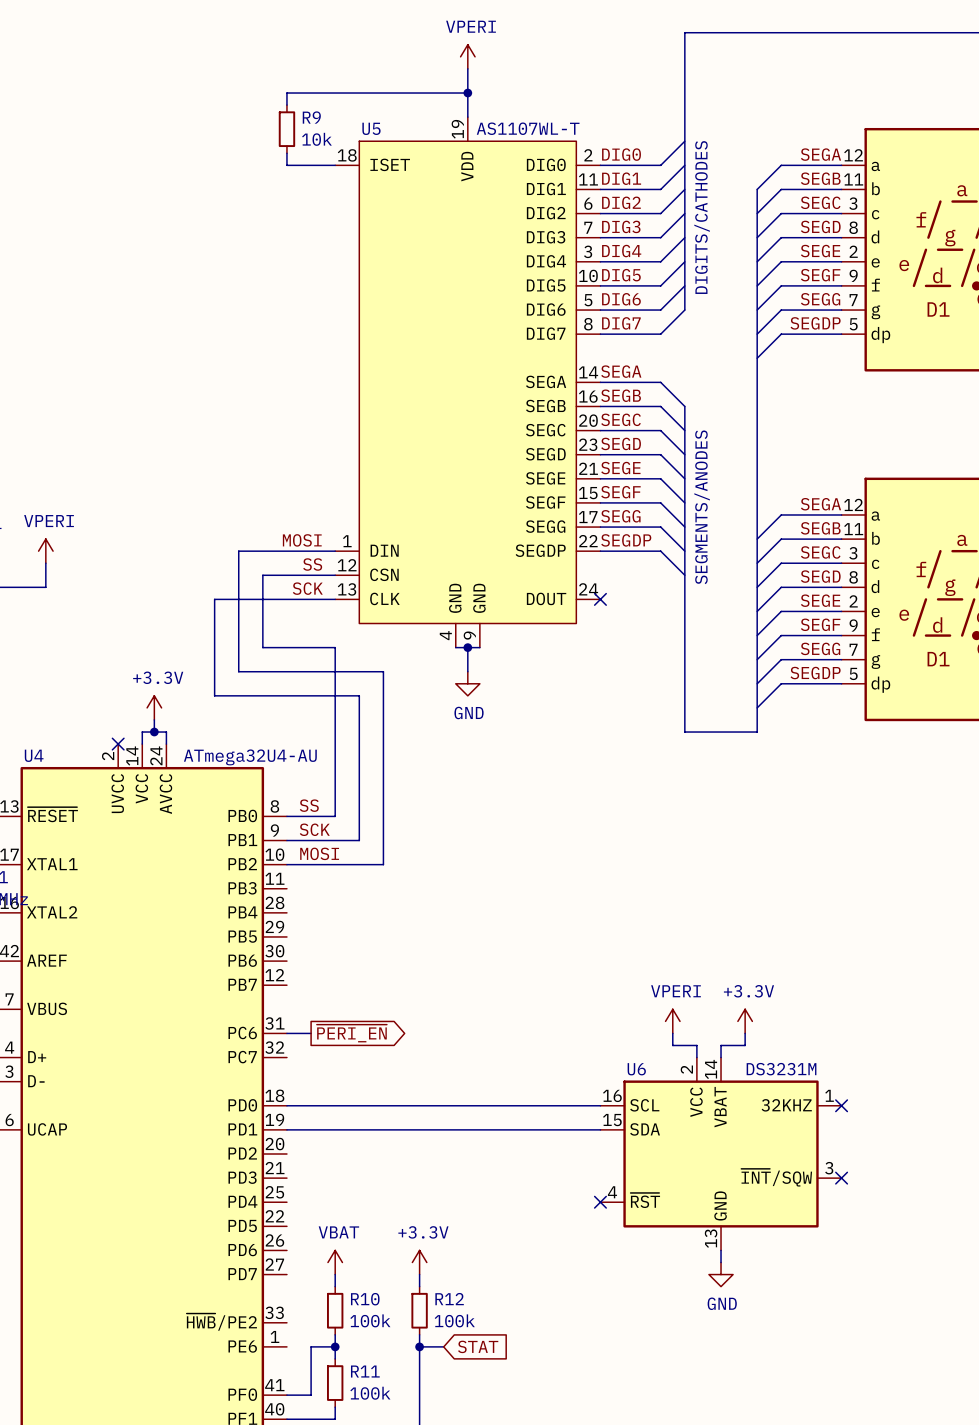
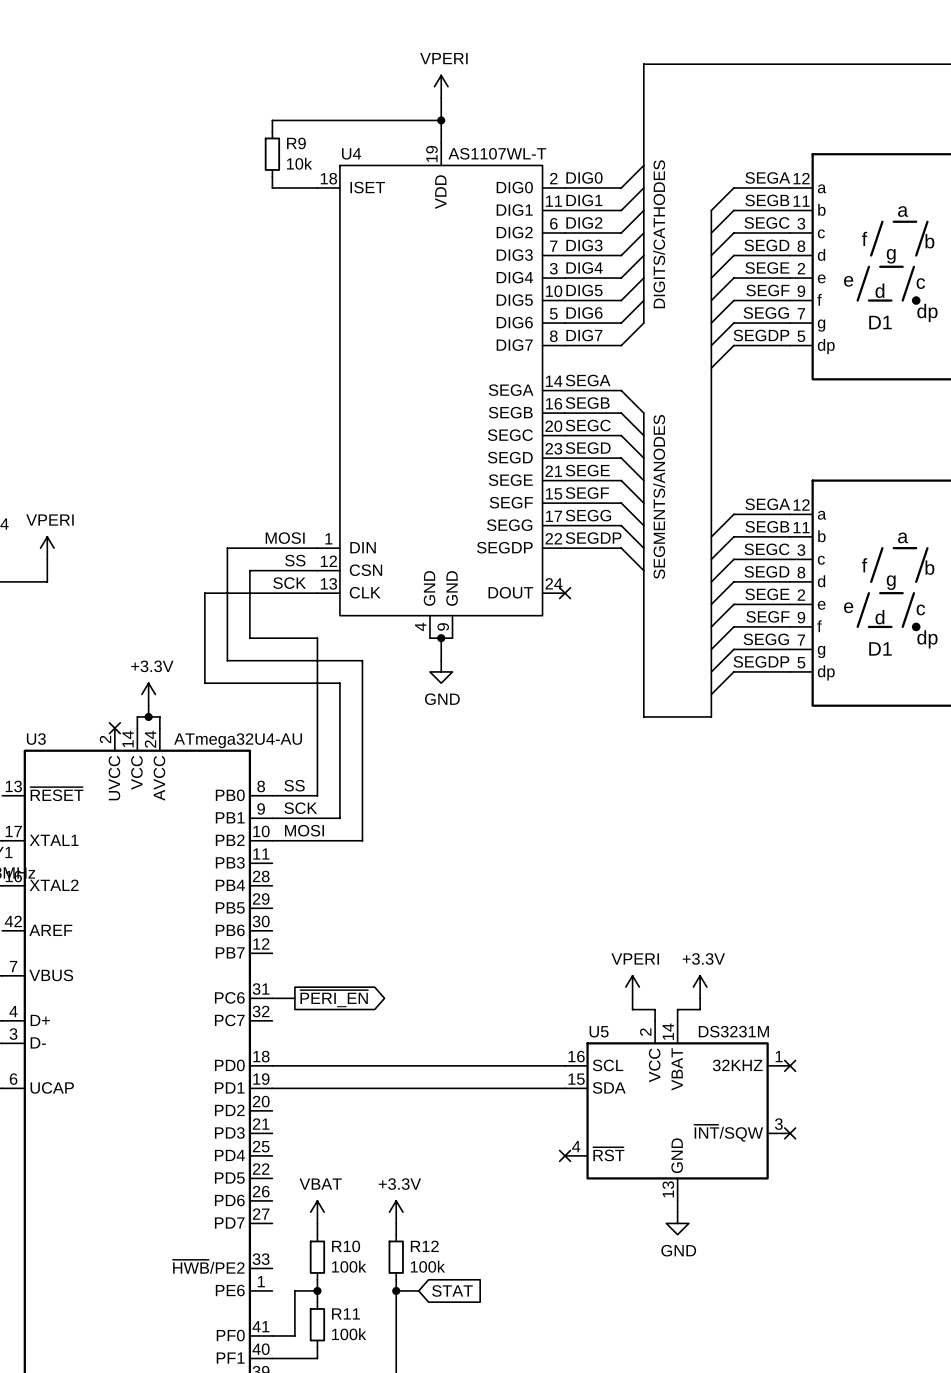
U5 name: U5 (371, 128) -> U4 (351, 153)
U4 name: U4 (34, 755) -> U3 (36, 739)
U6 name: U6 (636, 1069) -> U5 (599, 1031)

